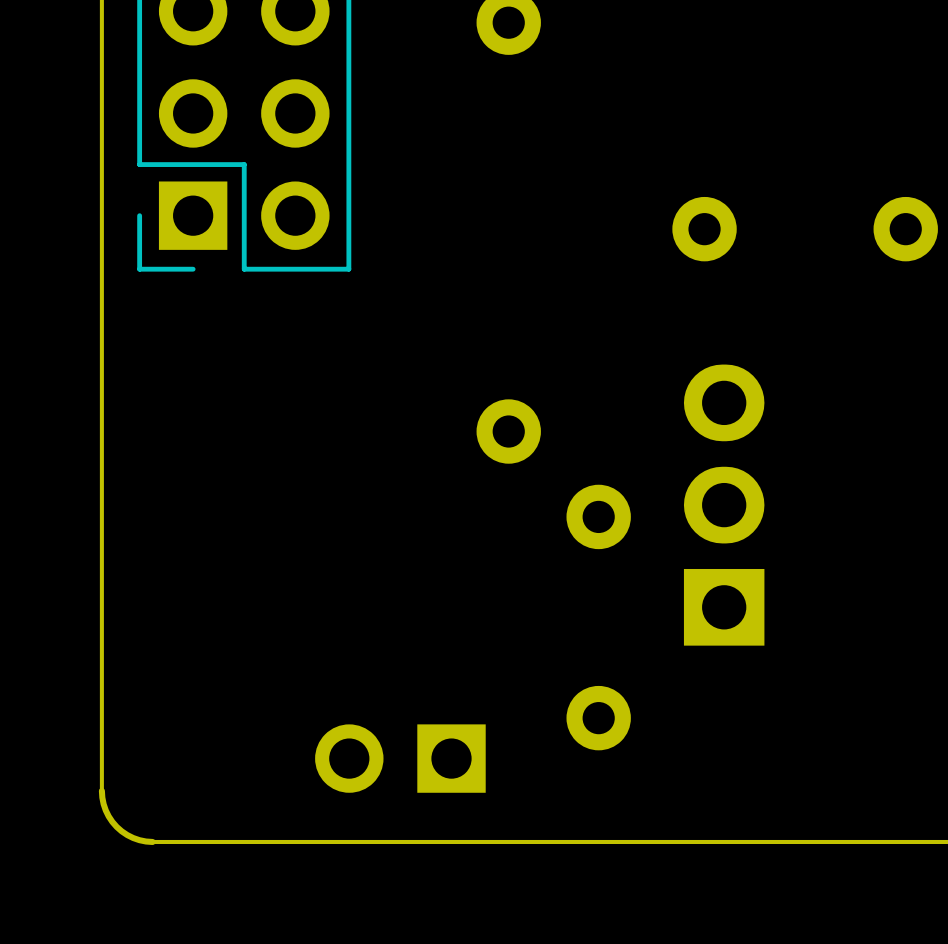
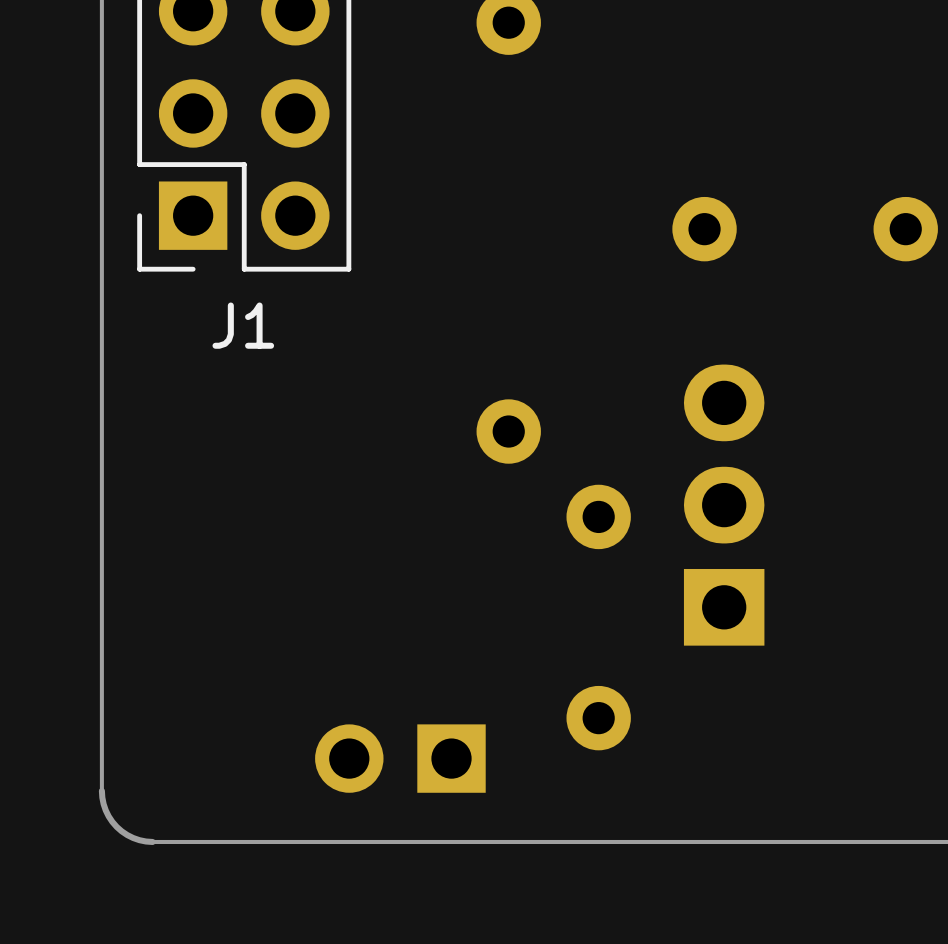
J1 name: none -> J1 (243, 325)

